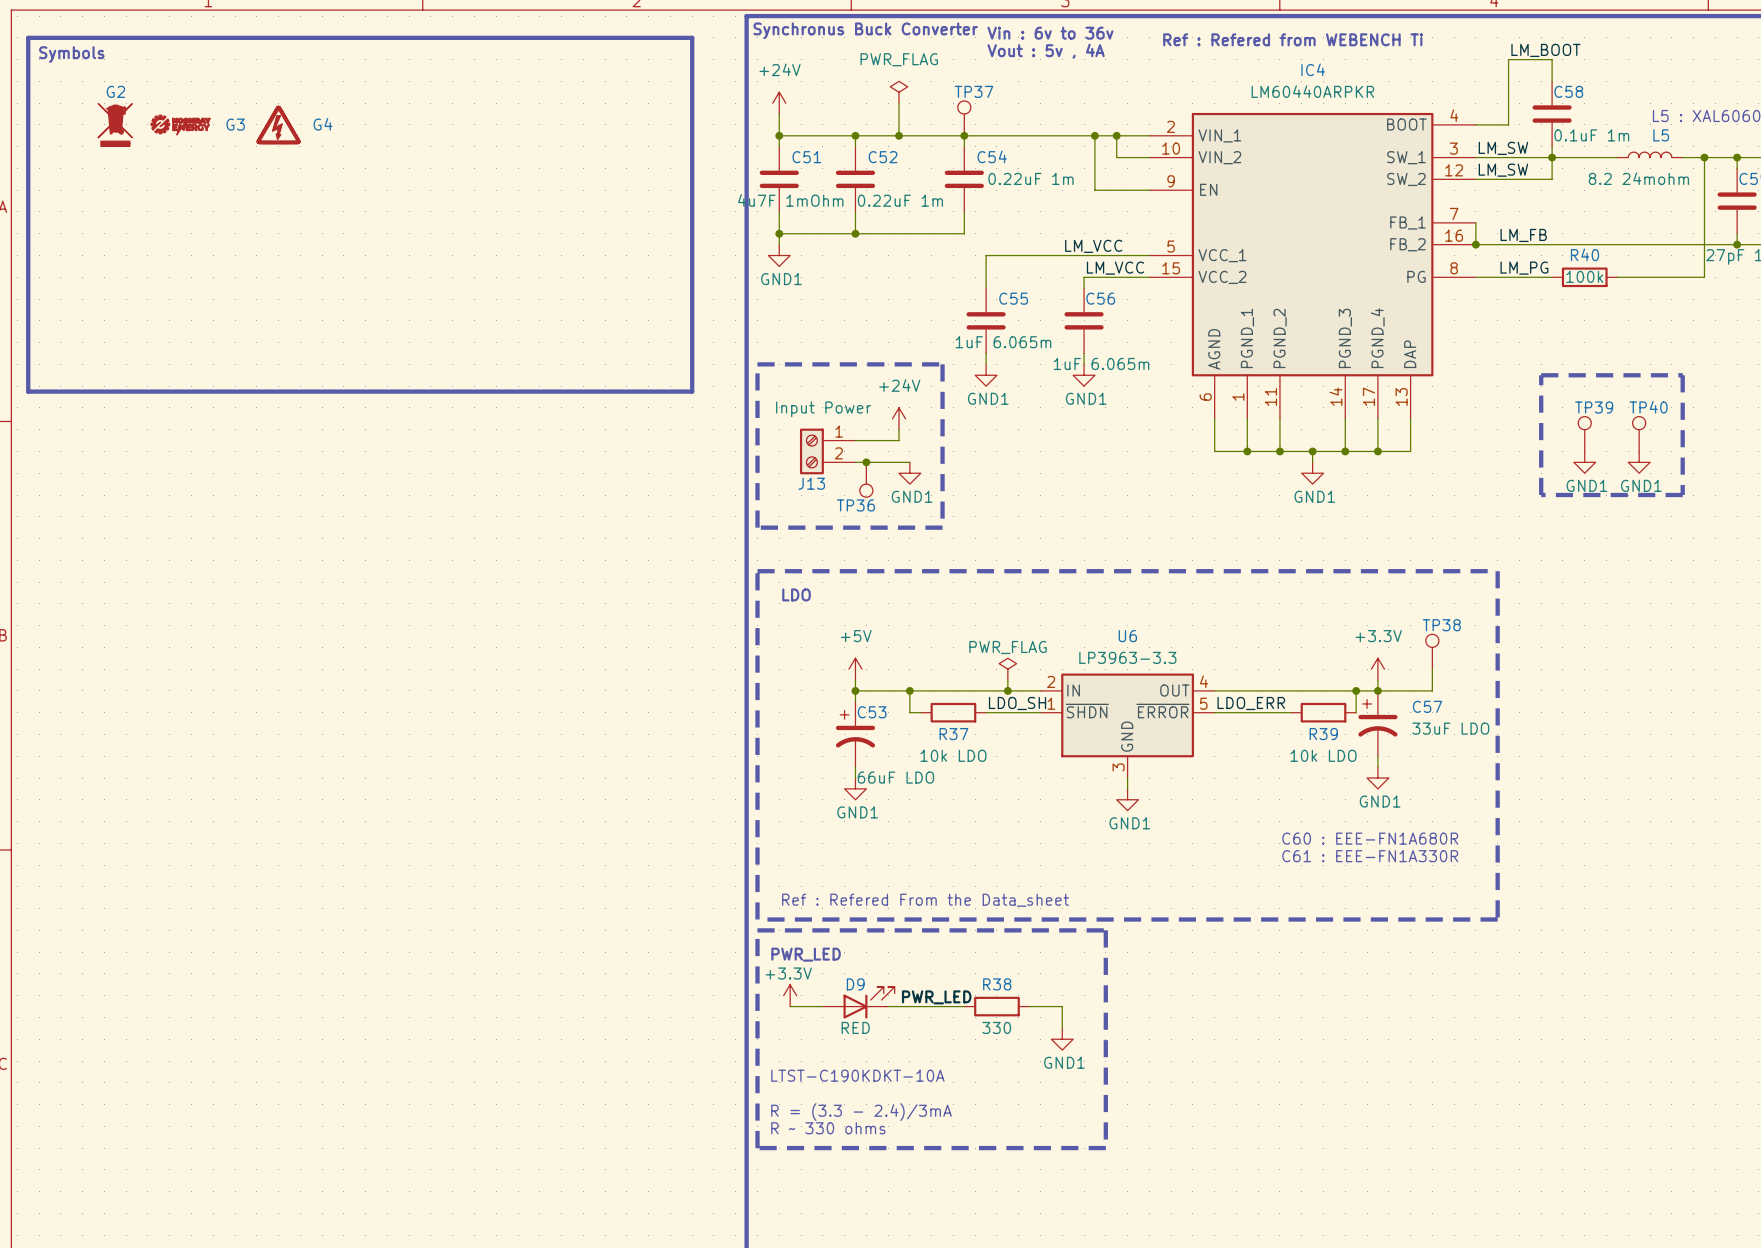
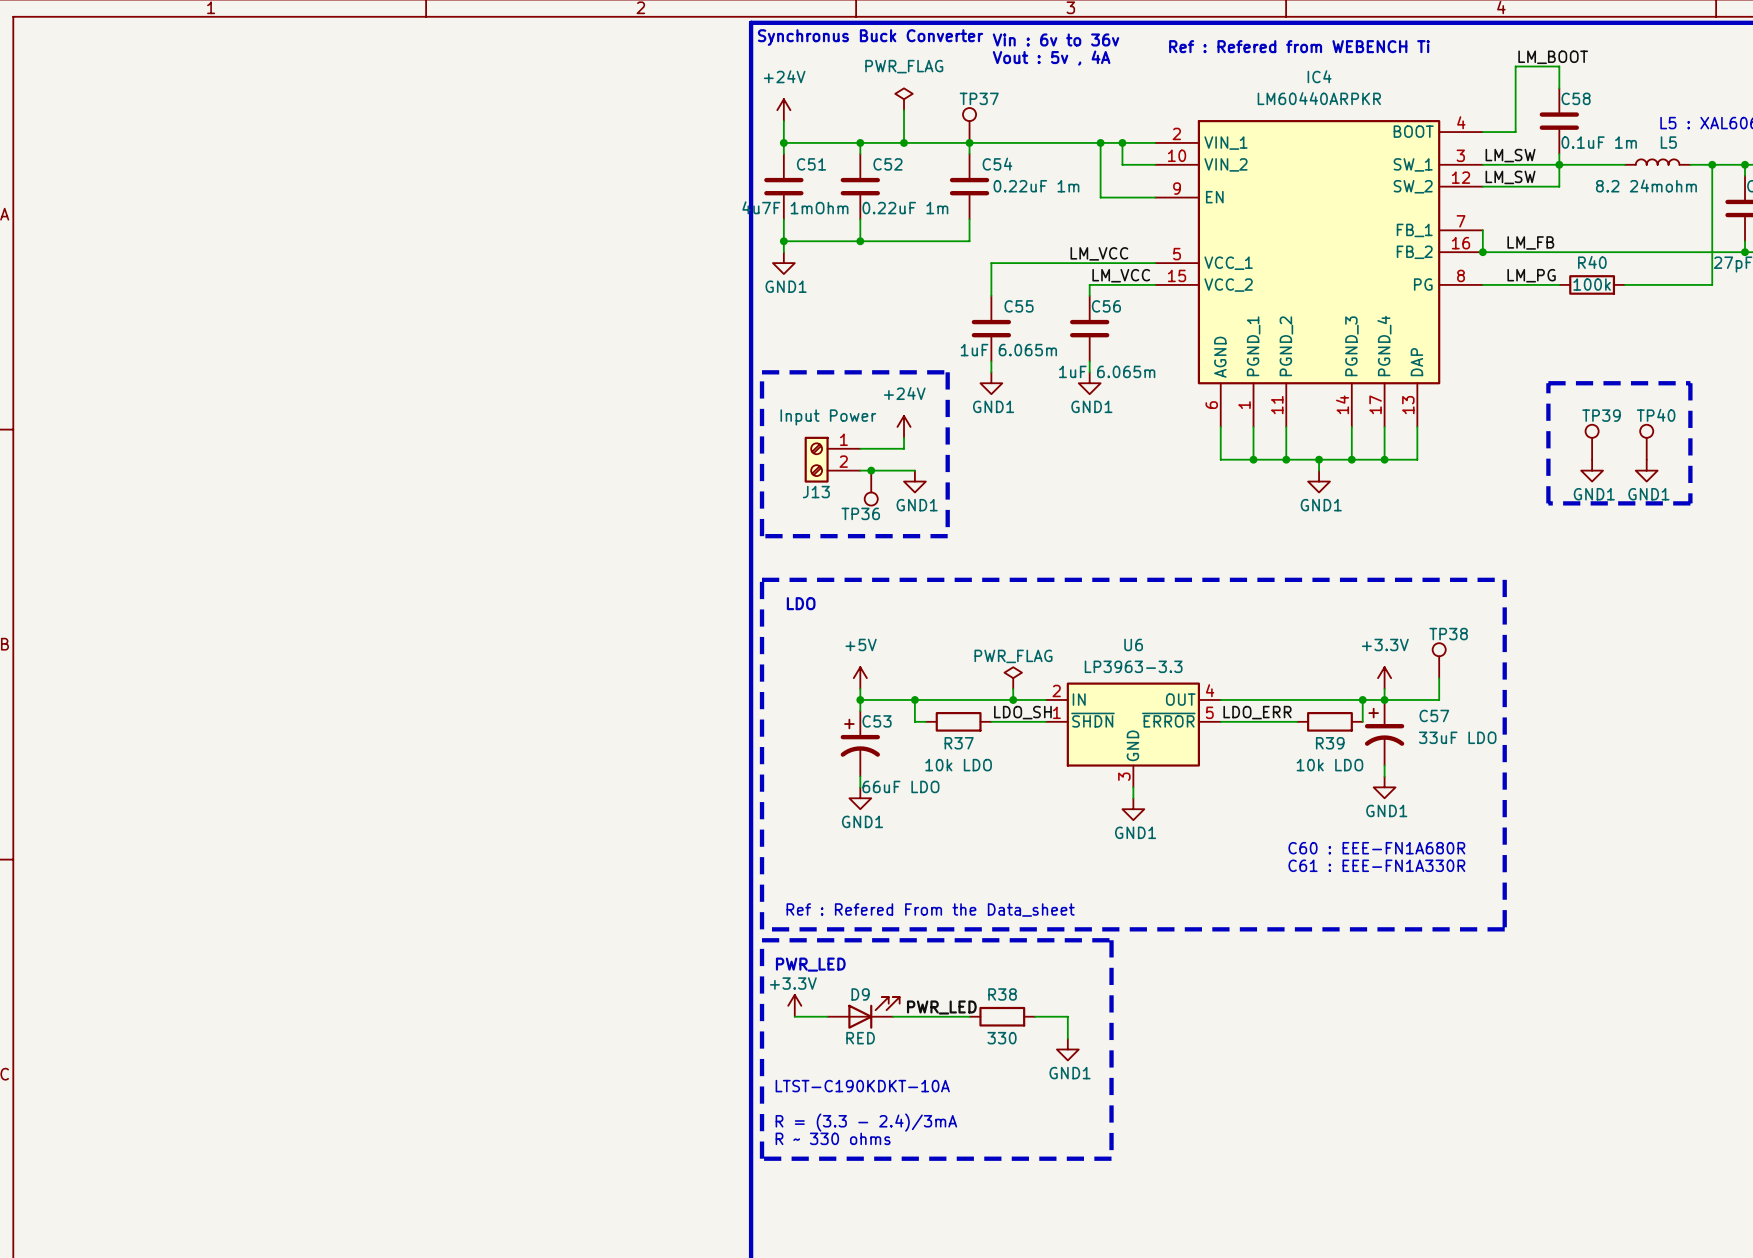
line: (28, 37) (692, 37) (692, 391) (28, 391) (28, 37) -> none
text: Symbols (71, 54) -> none
G2: (115, 124) -> none
G4: (278, 124) -> none
G3: (180, 125) -> none

